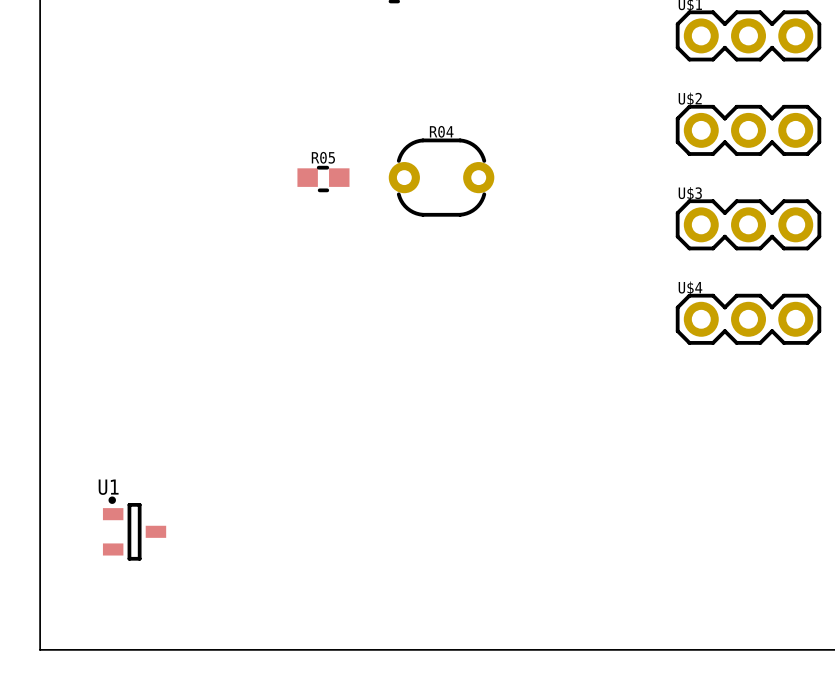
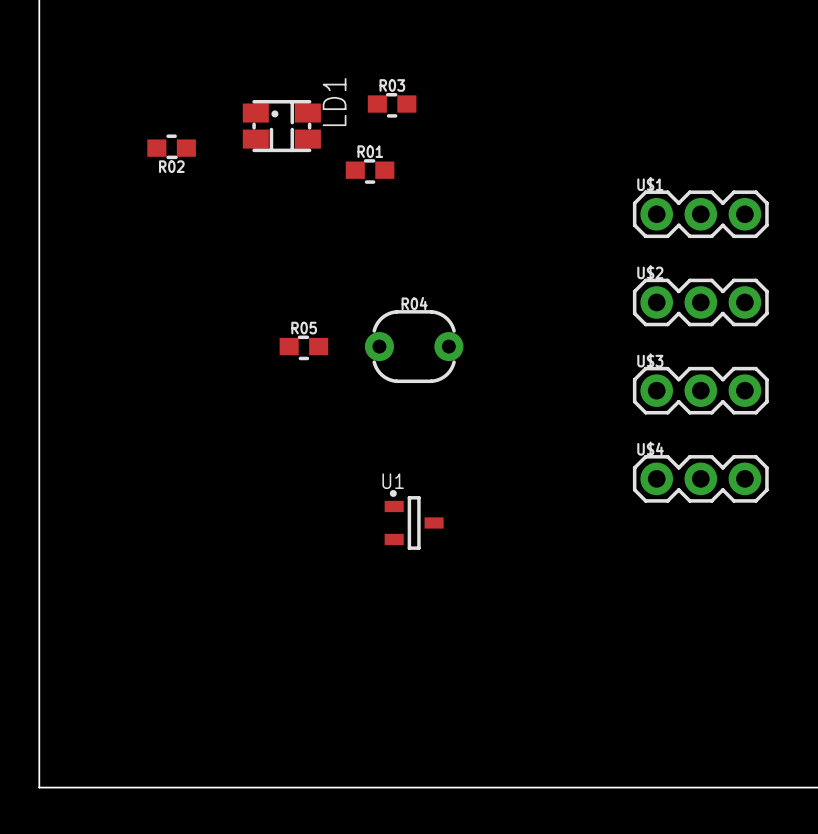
U1 position: (134, 528) -> (414, 519)

